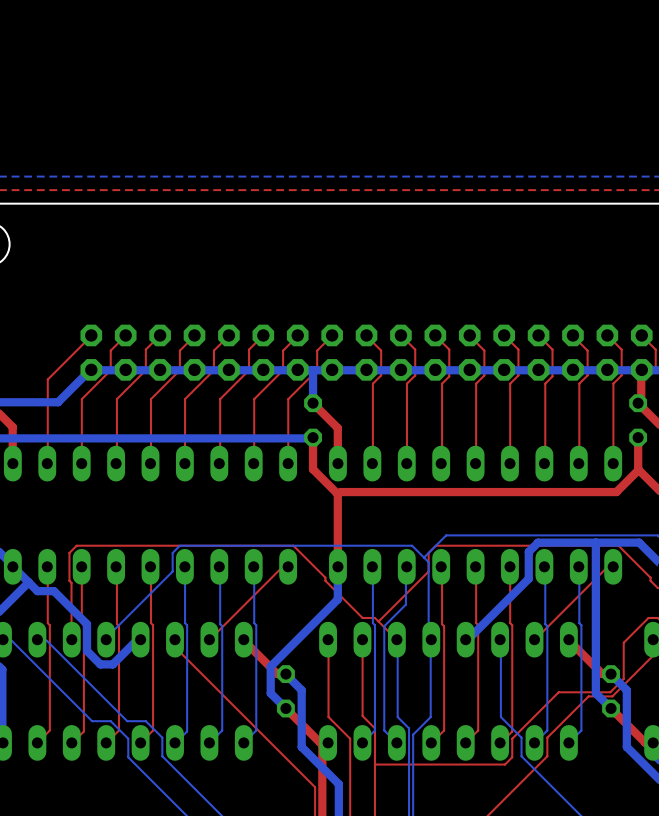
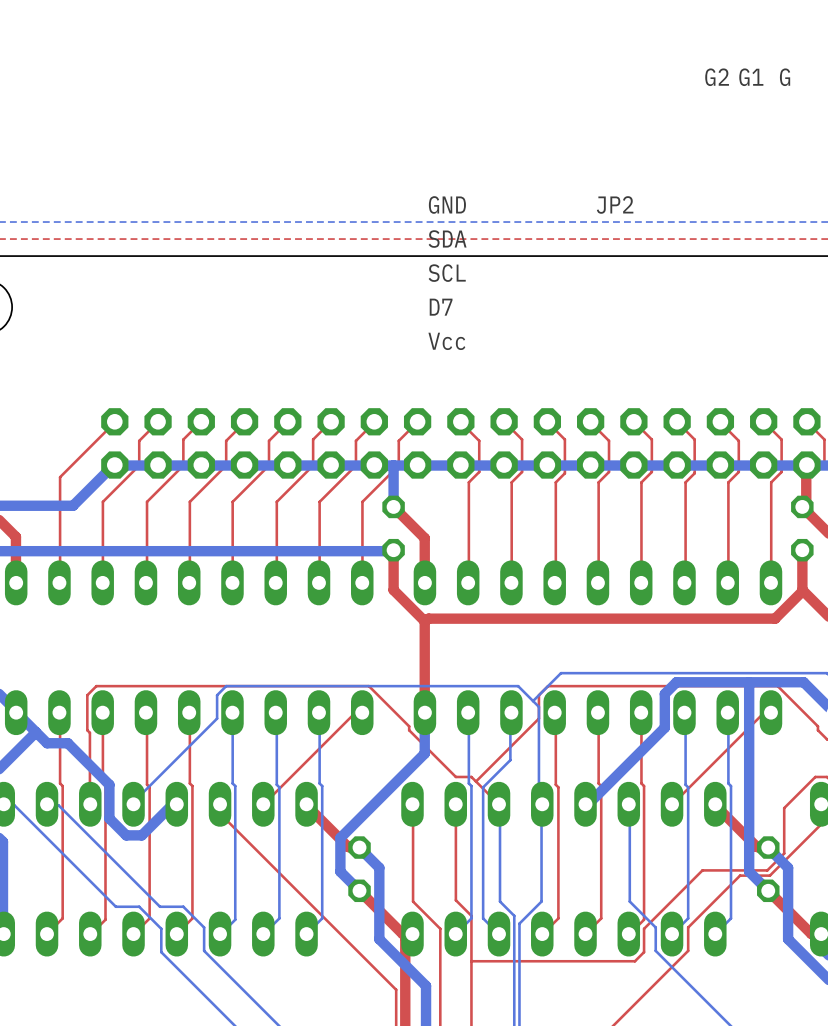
text: none -> G2 (717, 77)
text: none -> G1 (751, 77)
text: none -> G (785, 77)
text: none -> GND (447, 204)
text: none -> JP2 (615, 204)
text: none -> SDA (447, 239)
text: none -> SCL (447, 273)
text: none -> D7 (441, 307)
text: none -> Vcc (446, 341)

